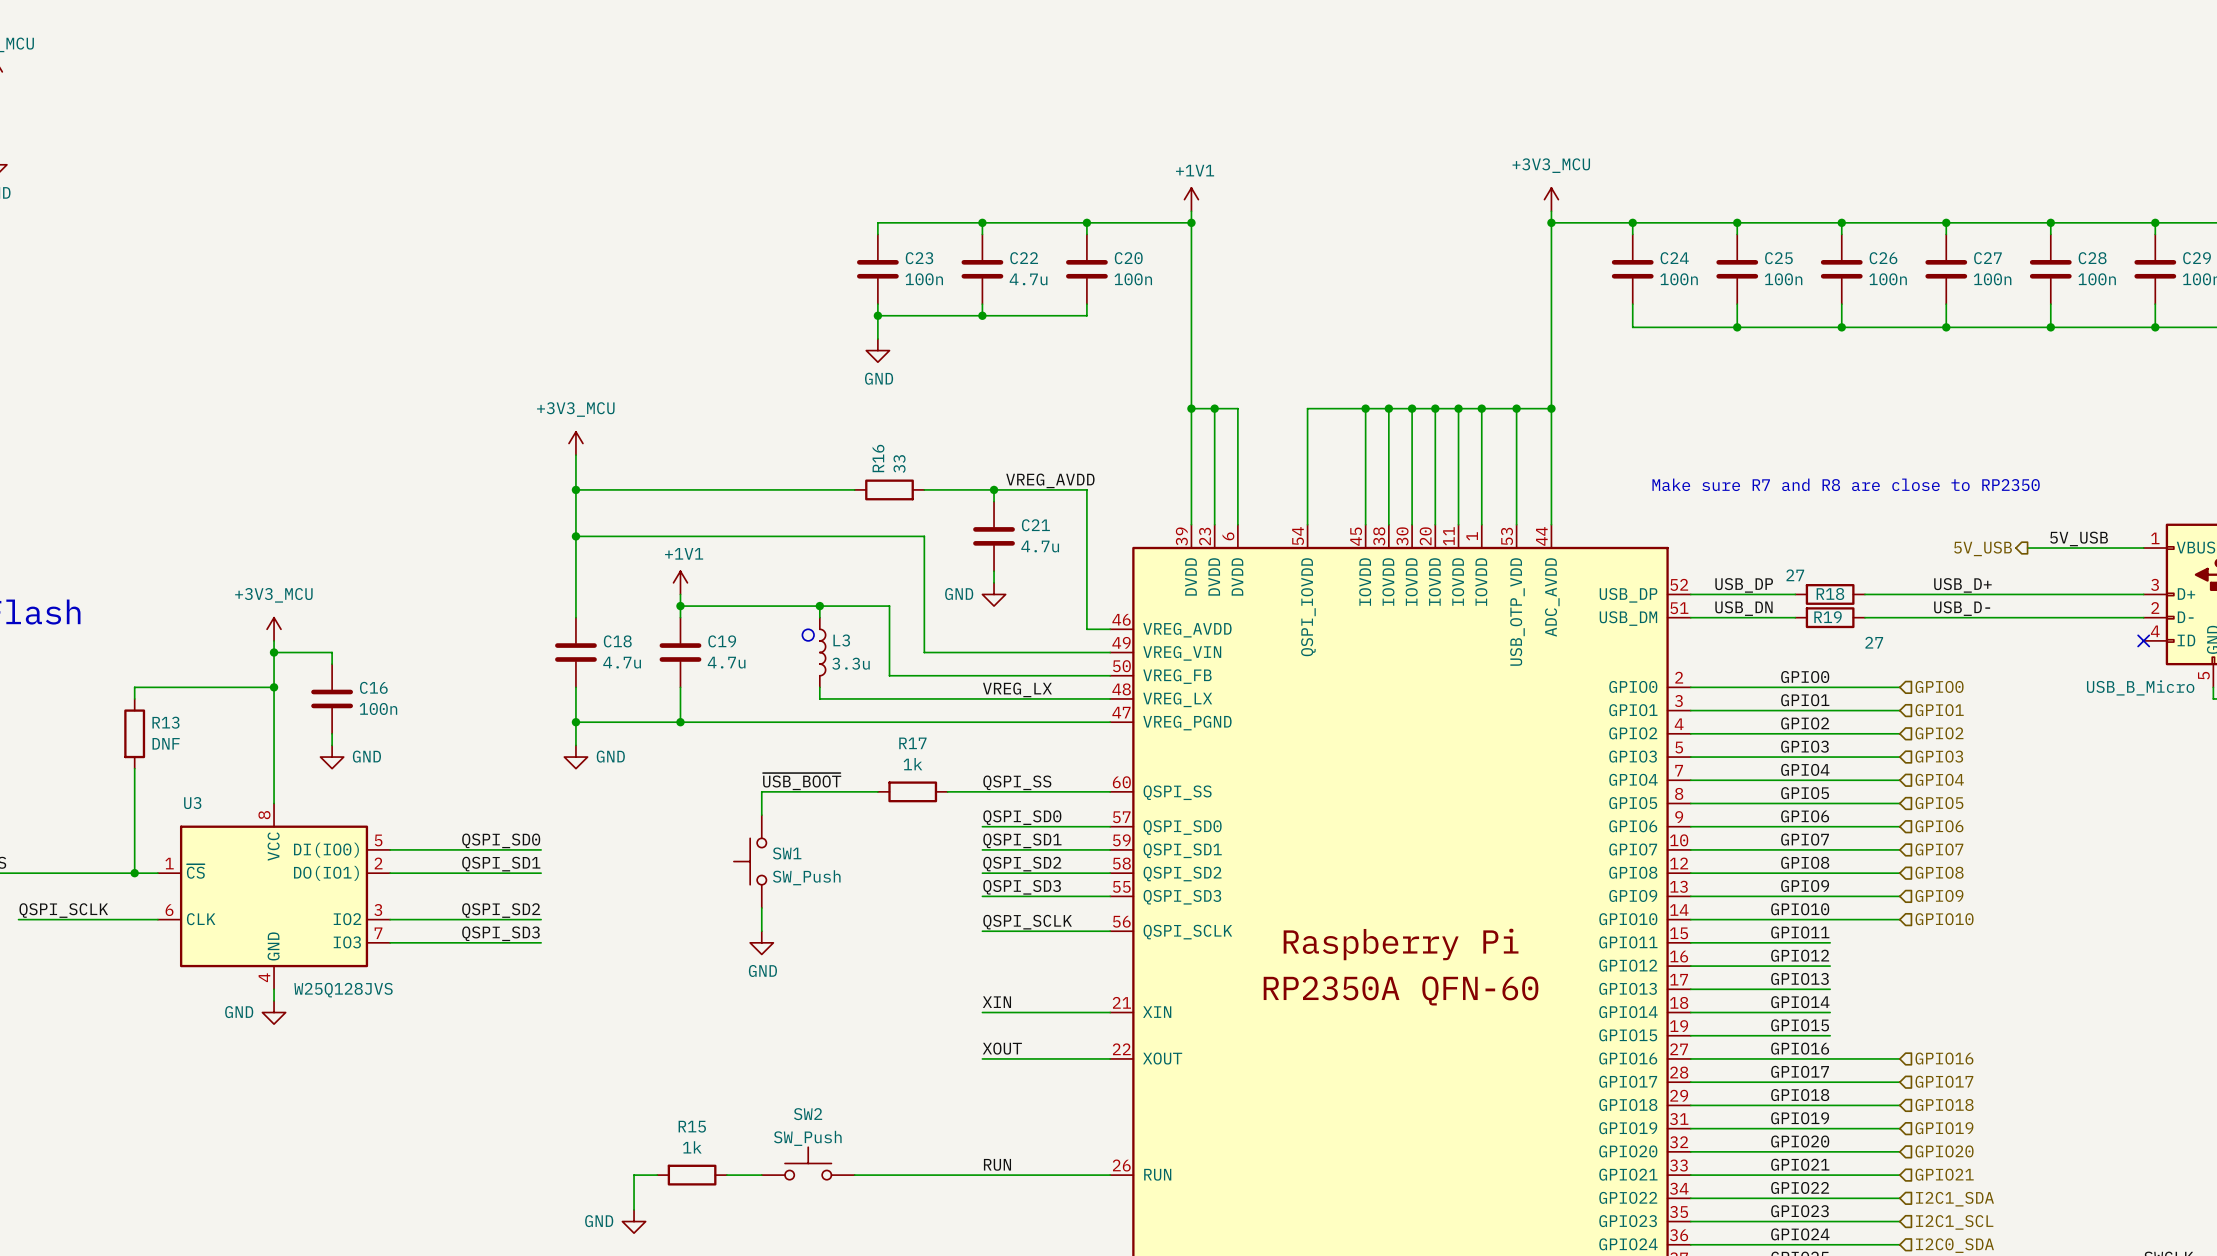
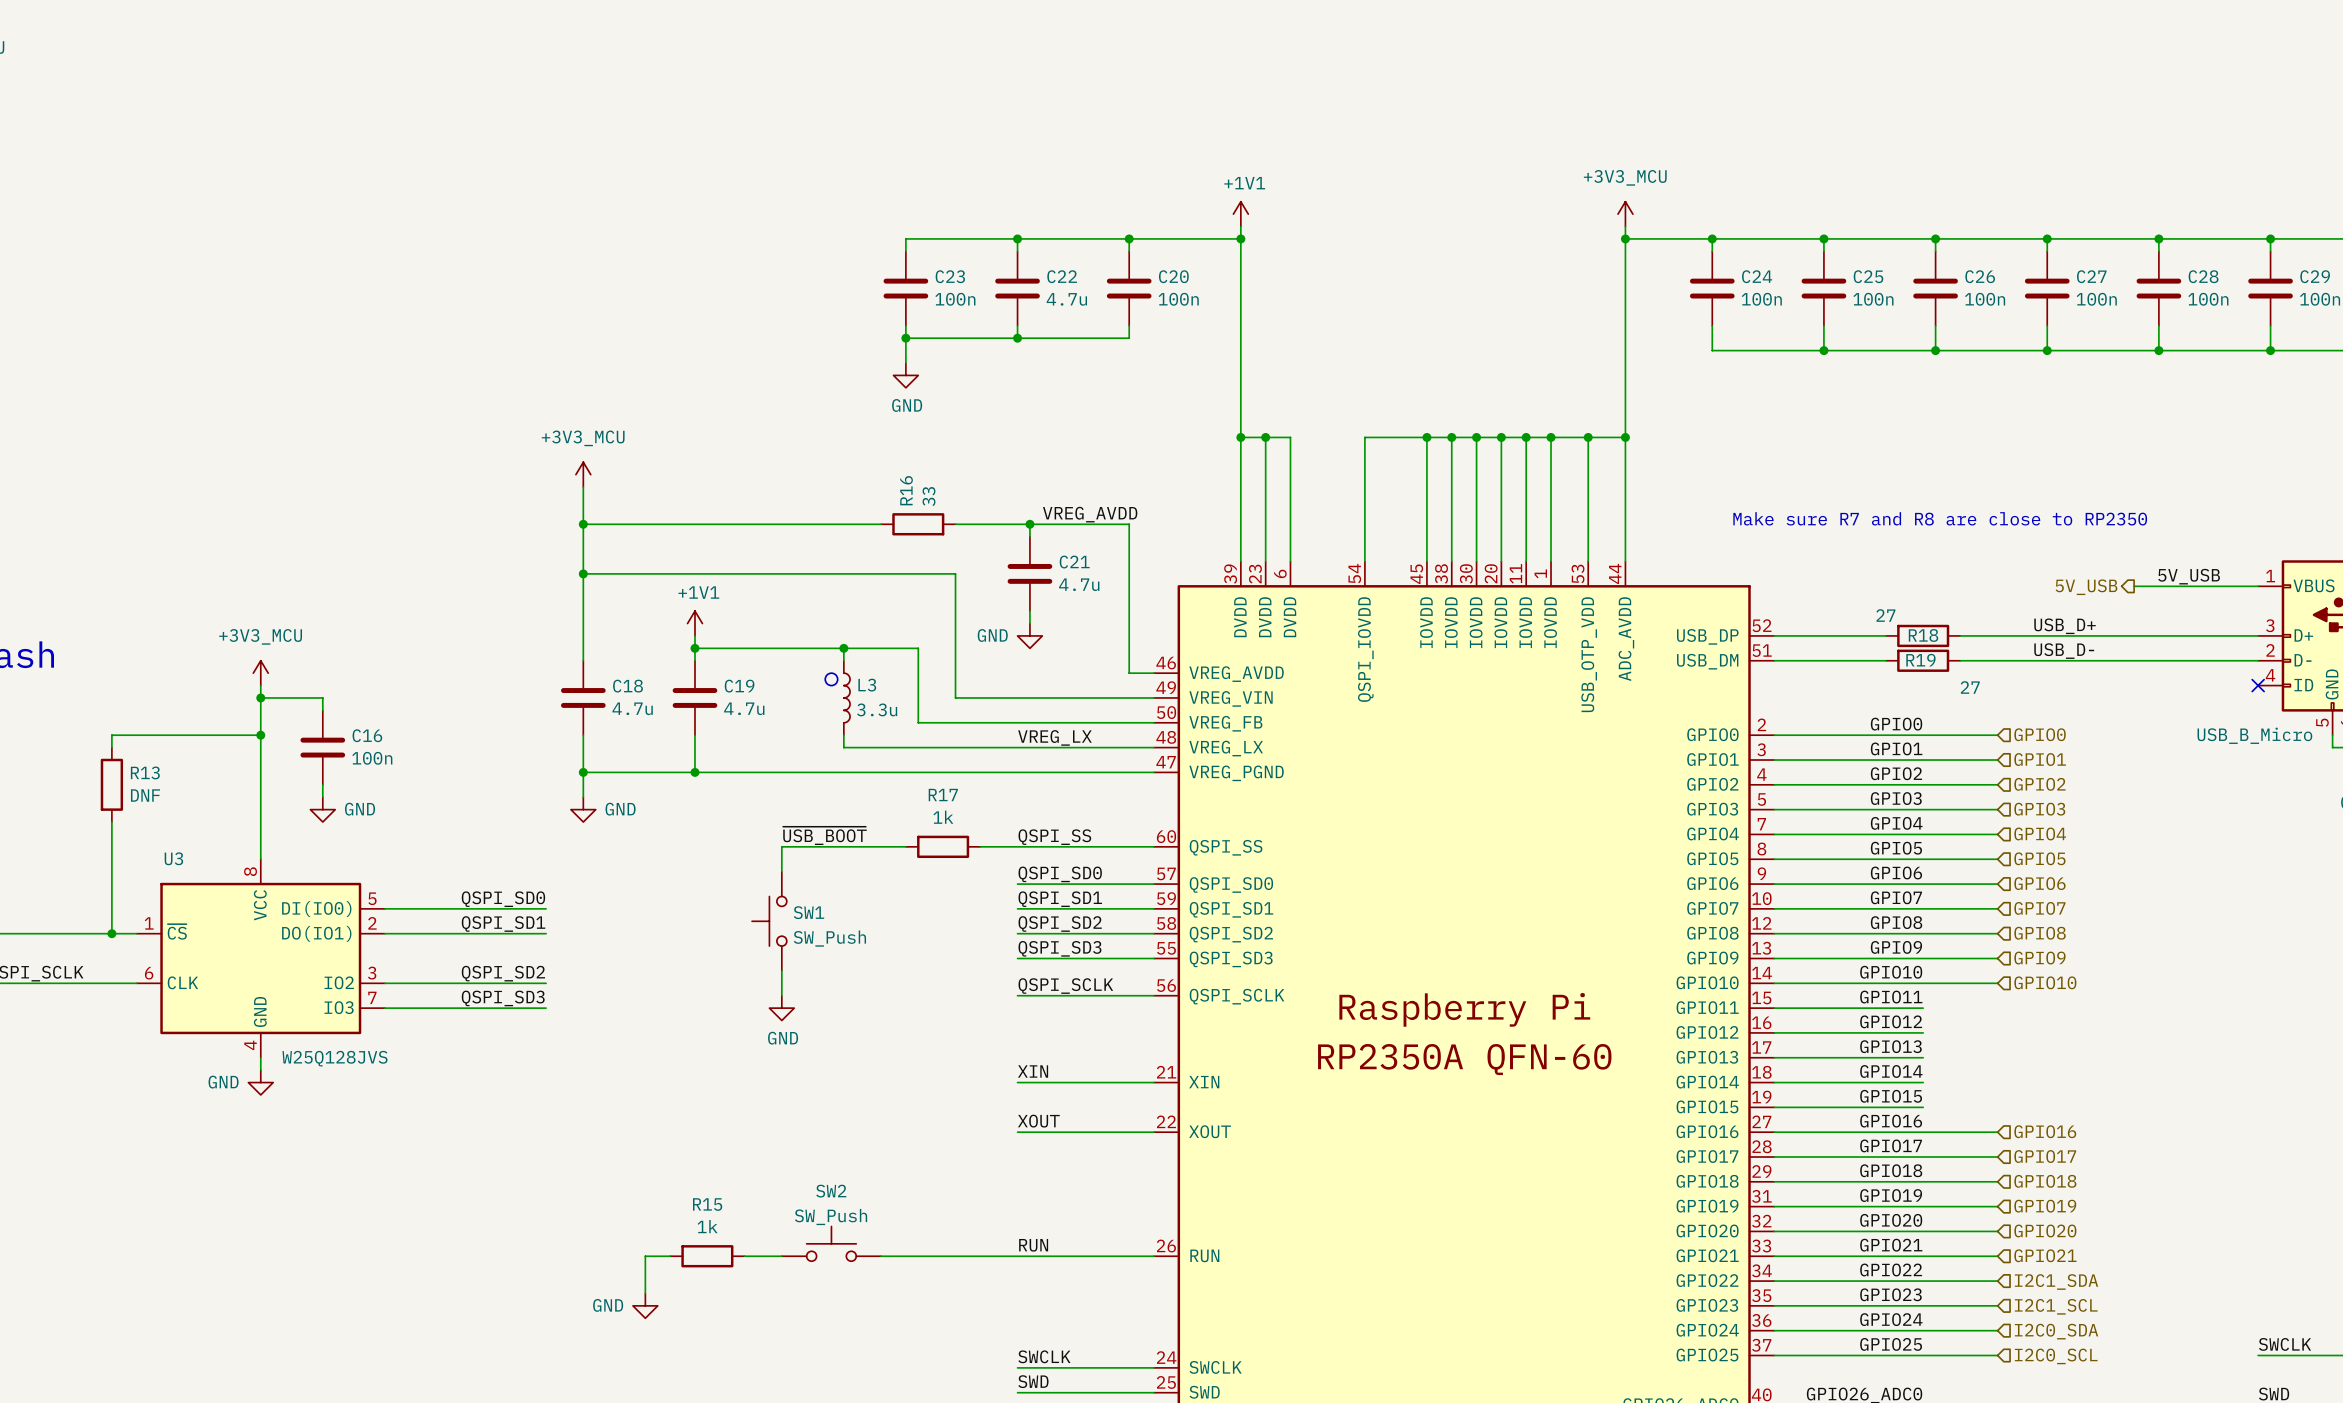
label: USB_DP (1744, 585) -> none
label: USB_DN (1743, 608) -> none

